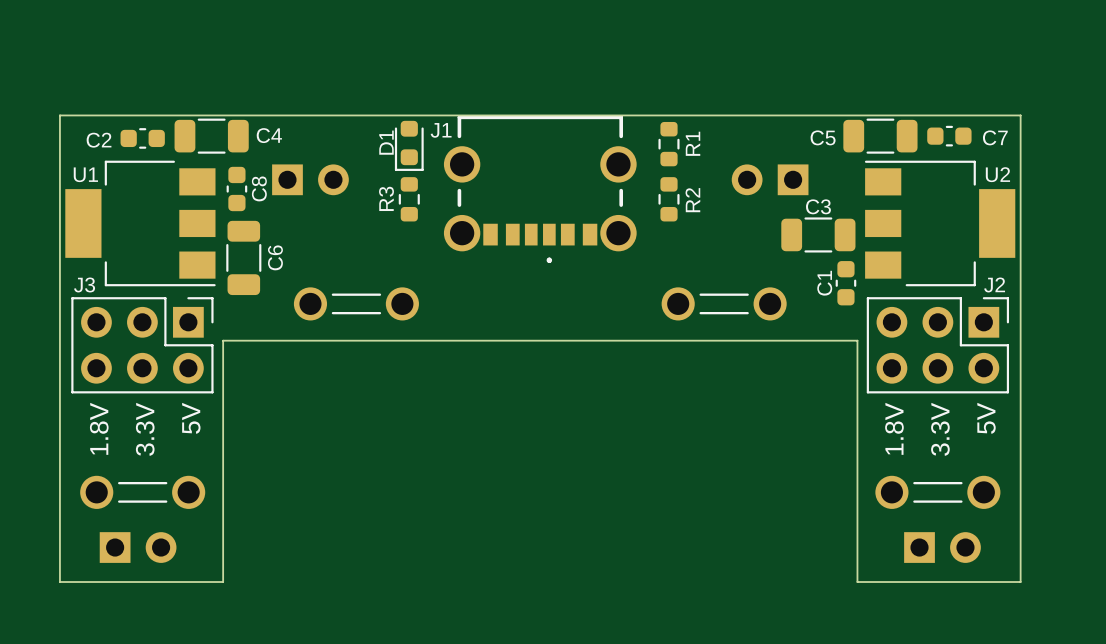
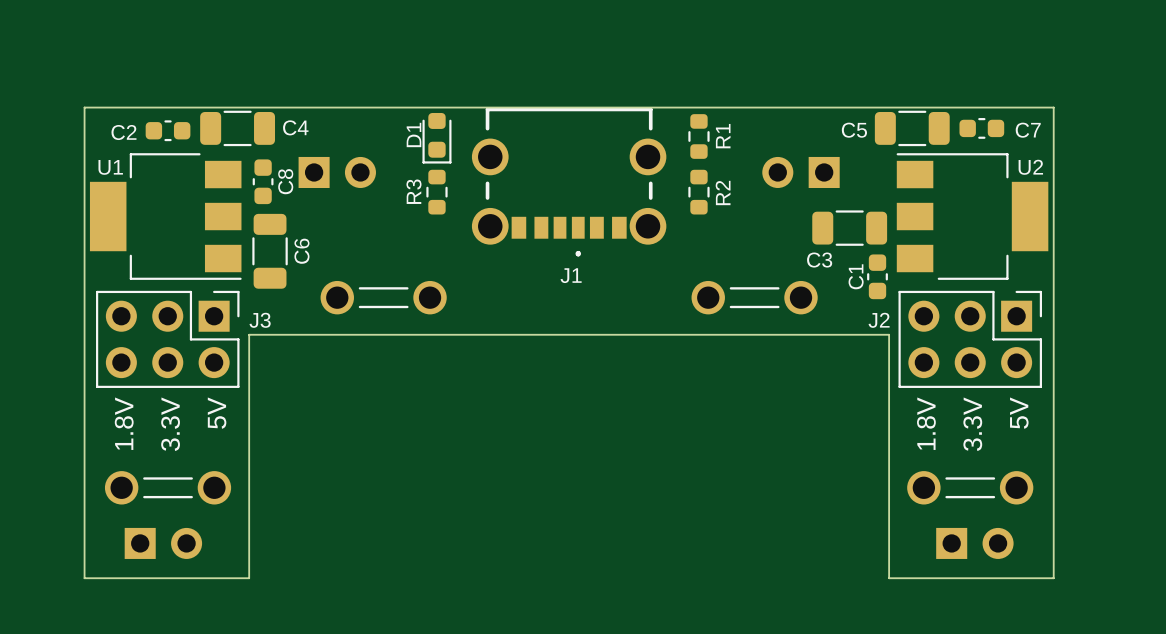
J1 name position: J1 (441, 130) -> J1 (571, 275)
C3 name position: C3 (818, 206) -> C3 (819, 260)
J3 name position: J3 (84, 284) -> J3 (260, 320)
J2 name position: J2 (994, 284) -> J2 (879, 320)

